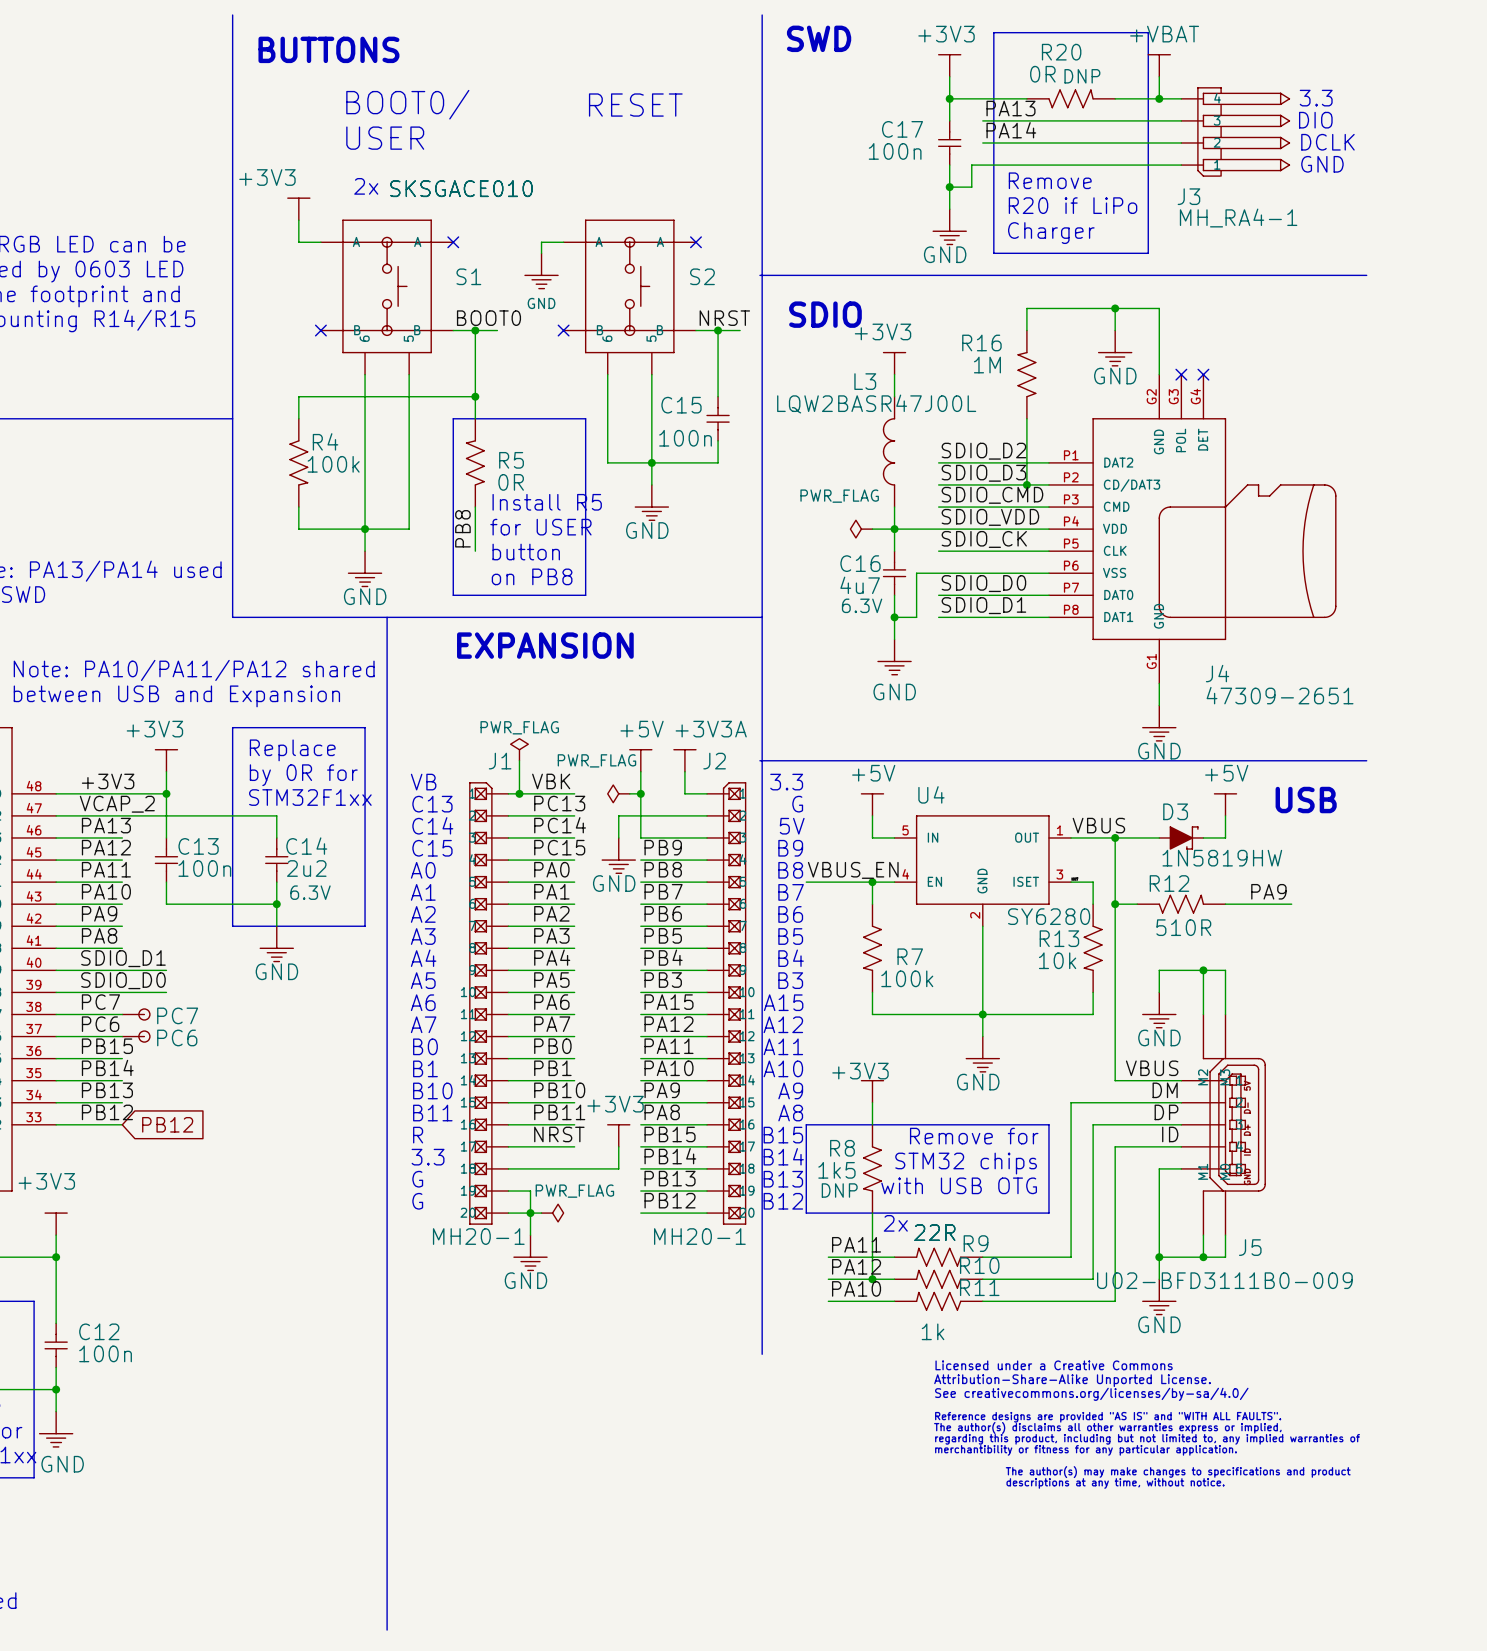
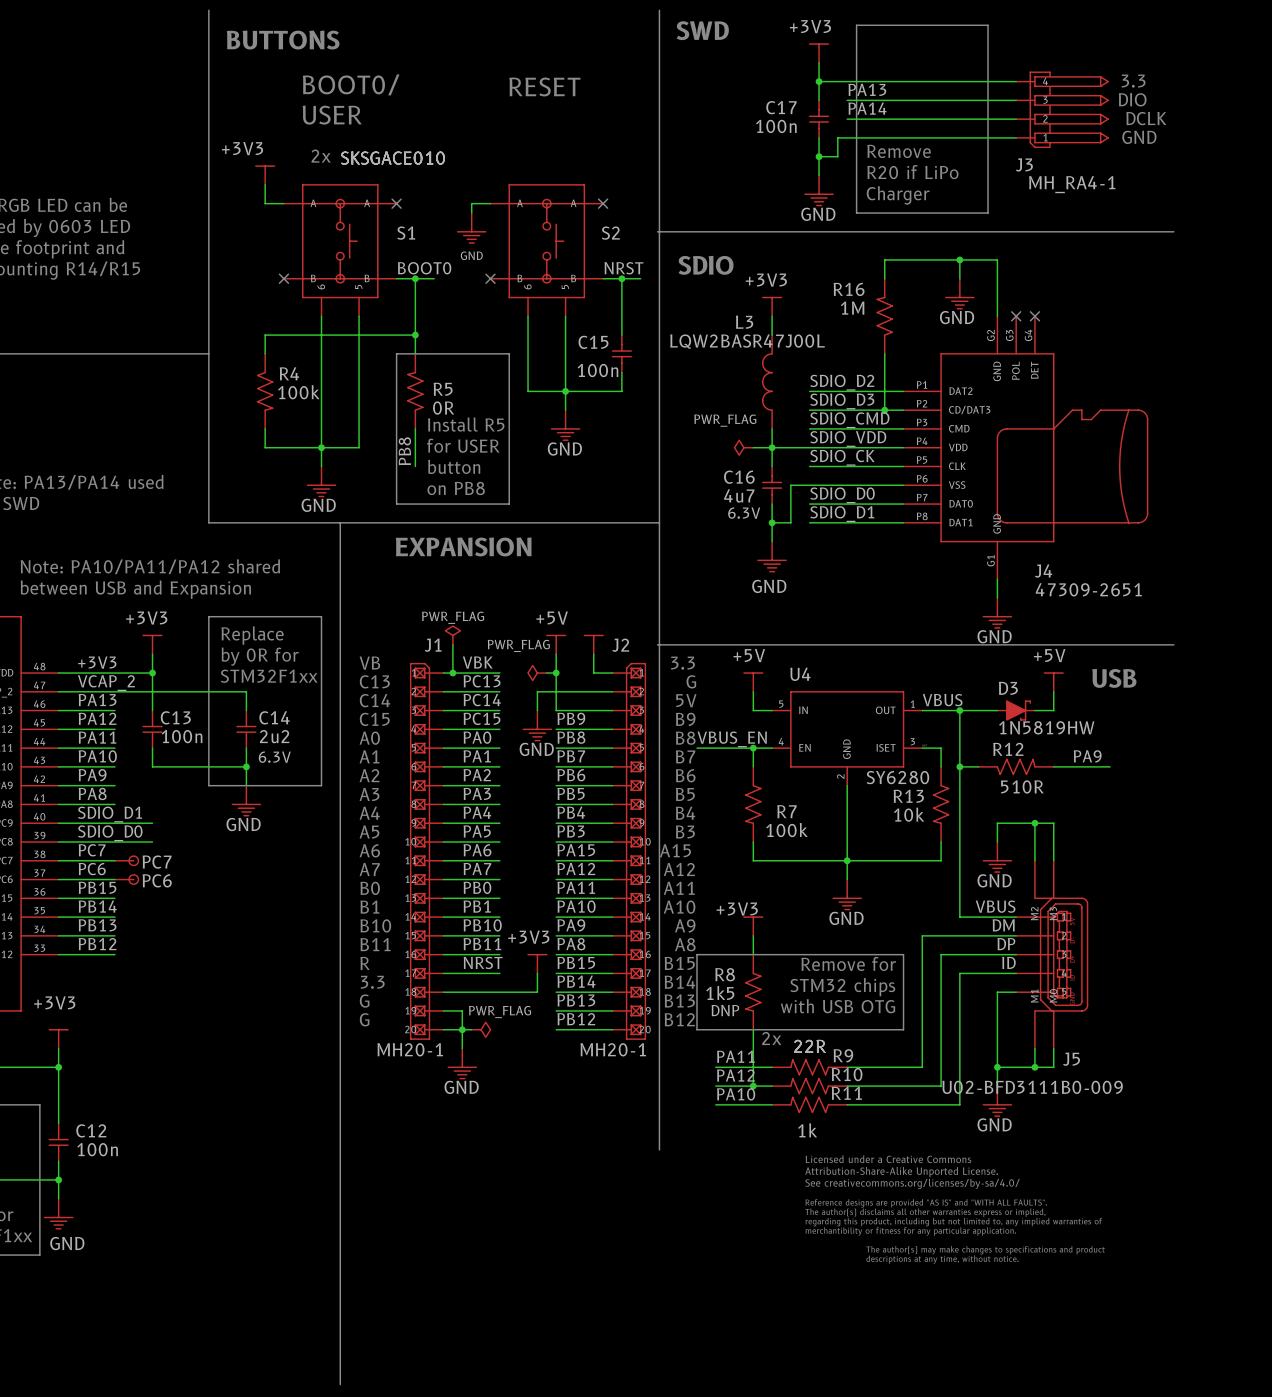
power symbol: +VBAT (1159, 65) -> none
wire: (1159, 76) (1159, 98) -> none
R20: 0R (1071, 98) -> none
junction: (1159, 98) -> none
power symbol text: +3V3A (711, 729) -> none
global label: PB12 (167, 1124) -> none

